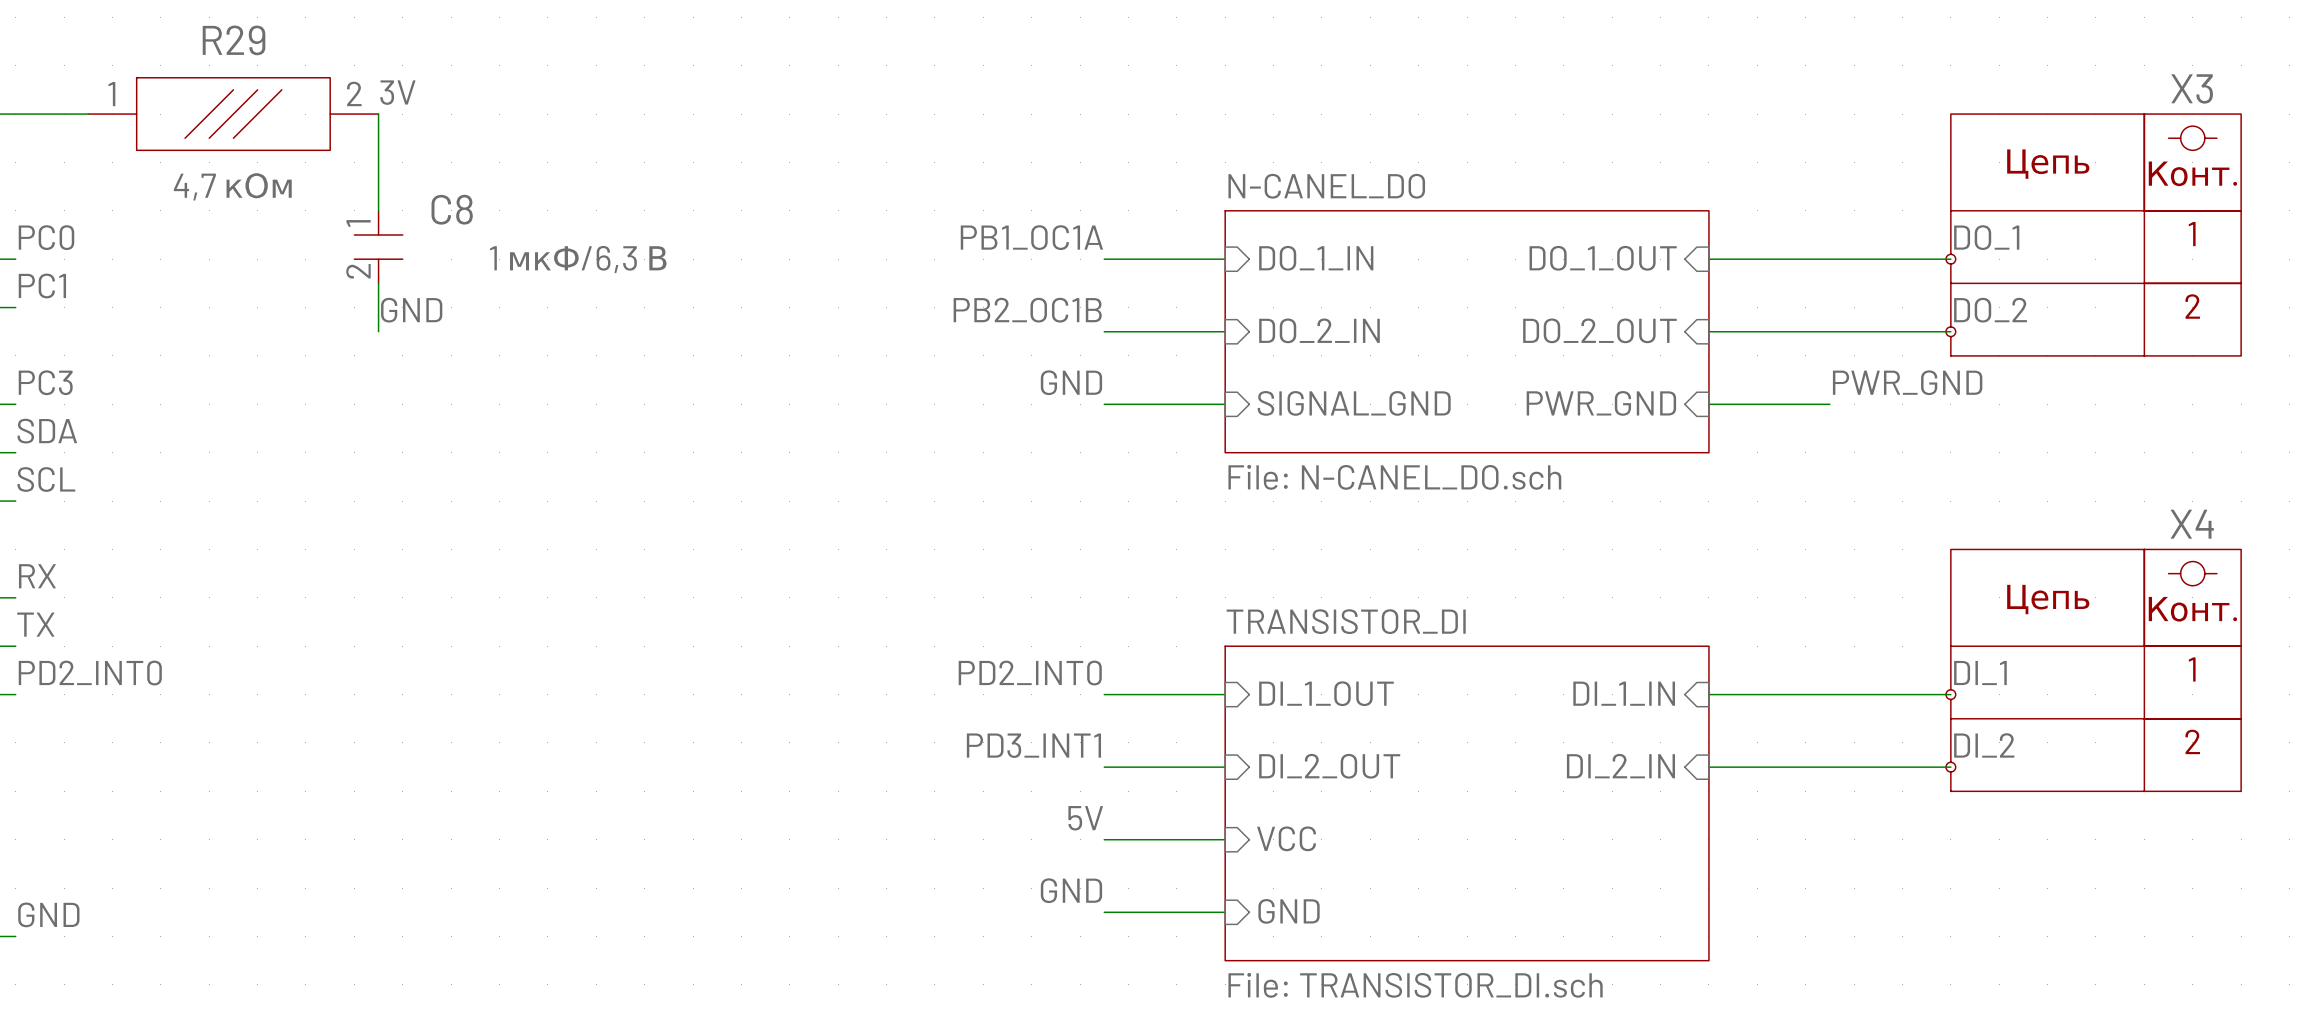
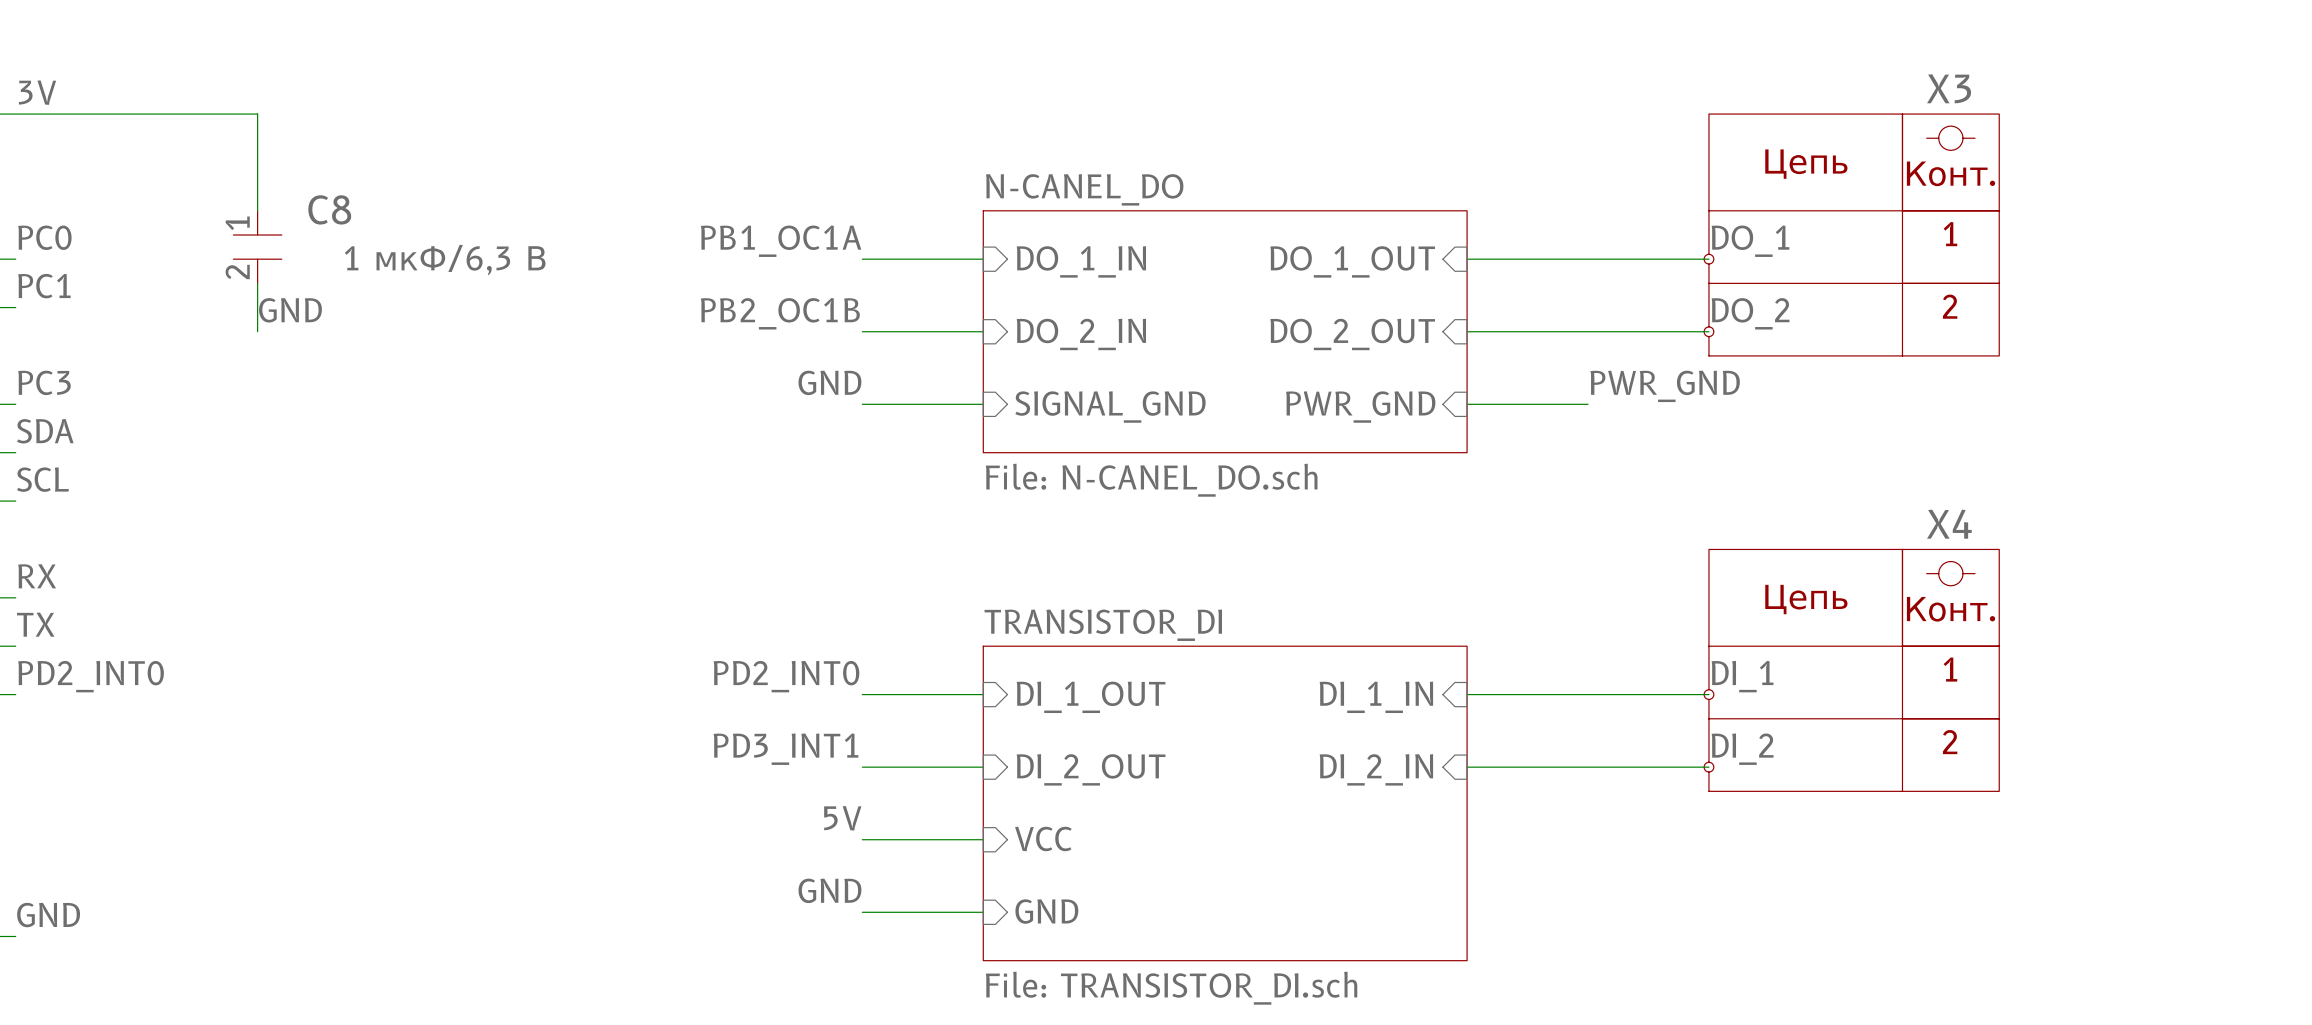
label position: 3V (397, 92) -> 3V (37, 92)
wire: none -> (88, 114) (257, 114) (257, 210)
R29: (233, 114) -> none
wire: (378, 114) (378, 210) -> none
X3 position: (2093, 234) -> (1851, 234)
label position: PB1_OC1A (1031, 237) -> PB1_OC1A (781, 241)
label position: DO_1 (1986, 237) -> DO_1 (1750, 241)
C8 position: (378, 247) -> (257, 247)
sheet pin position: DO_1_IN (1316, 258) -> DO_1_IN (1081, 261)
sheet pin position: DO_1_OUT (1603, 258) -> DO_1_OUT (1352, 261)
wire: (1104, 259) (1225, 259) -> (862, 259) (983, 259)
wire: (1708, 259) (1950, 259) -> (1708, 259) (1467, 259)
wire: (378, 283) (378, 331) -> (257, 283) (257, 331)
label position: GND (411, 310) -> GND (290, 310)
label position: PB2_OC1B (1027, 310) -> PB2_OC1B (780, 313)
label position: DO_2 (1990, 310) -> DO_2 (1750, 313)
sheet pin position: DO_2_IN (1319, 330) -> DO_2_IN (1081, 334)
sheet pin position: DO_2_OUT (1599, 330) -> DO_2_OUT (1352, 334)
wire: (1104, 331) (1225, 331) -> (862, 331) (983, 331)
sheet N-CANEL_DO position: (1467, 331) -> (1225, 331)
wire: (1708, 331) (1950, 331) -> (1708, 331) (1467, 331)
label position: GND (1071, 382) -> GND (829, 382)
label position: PWR_GND (1907, 382) -> PWR_GND (1665, 386)
sheet pin position: SIGNAL_GND (1354, 403) -> SIGNAL_GND (1110, 407)
sheet pin position: PWR_GND (1601, 403) -> PWR_GND (1360, 407)
wire: (1104, 404) (1225, 404) -> (862, 404) (983, 404)
wire: (1708, 404) (1829, 404) -> (1467, 404) (1588, 404)
X4 position: (2093, 670) -> (1851, 670)
label position: PD2_INT0 (1030, 673) -> PD2_INT0 (786, 676)
label position: DI_1 (1980, 673) -> DI_1 (1742, 676)
sheet pin position: DI_1_OUT (1326, 693) -> DI_1_OUT (1091, 697)
sheet pin position: DI_1_IN (1624, 693) -> DI_1_IN (1376, 697)
wire: (1104, 694) (1225, 694) -> (862, 694) (983, 694)
wire: (1708, 694) (1950, 694) -> (1708, 694) (1467, 694)
label position: PD3_INT1 (1033, 745) -> PD3_INT1 (786, 749)
label position: DI_2 (1984, 745) -> DI_2 (1742, 749)
sheet pin position: DI_2_OUT (1329, 766) -> DI_2_OUT (1091, 769)
sheet pin position: DI_2_IN (1620, 766) -> DI_2_IN (1376, 769)
wire: (1104, 767) (1225, 767) -> (862, 767) (983, 767)
wire: (1708, 767) (1950, 767) -> (1708, 767) (1467, 767)
sheet TRANSISTOR_DI position: (1467, 803) -> (1225, 803)
label position: 5V (1085, 818) -> 5V (842, 818)
sheet pin position: VCC (1286, 838) -> VCC (1043, 838)
wire: (1104, 839) (1225, 839) -> (862, 839) (983, 839)
label position: GND (1071, 890) -> GND (829, 890)
sheet pin position: GND (1289, 911) -> GND (1046, 911)
wire: (1104, 912) (1225, 912) -> (862, 912) (983, 912)

